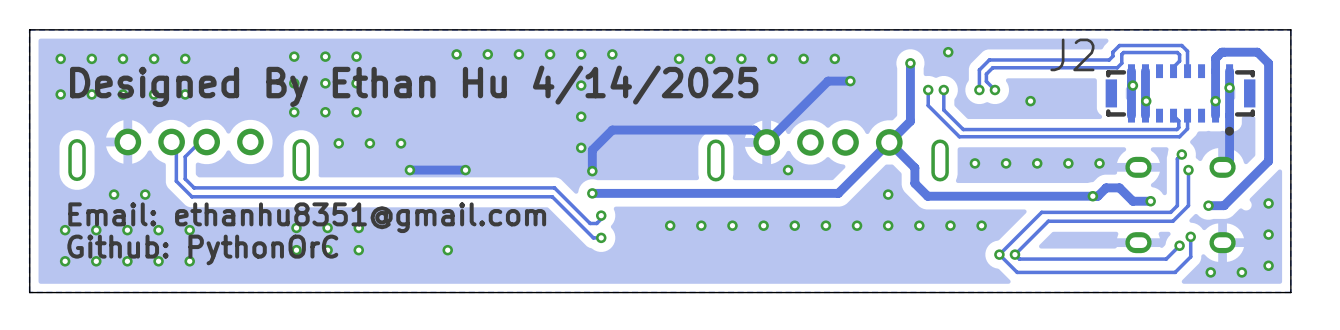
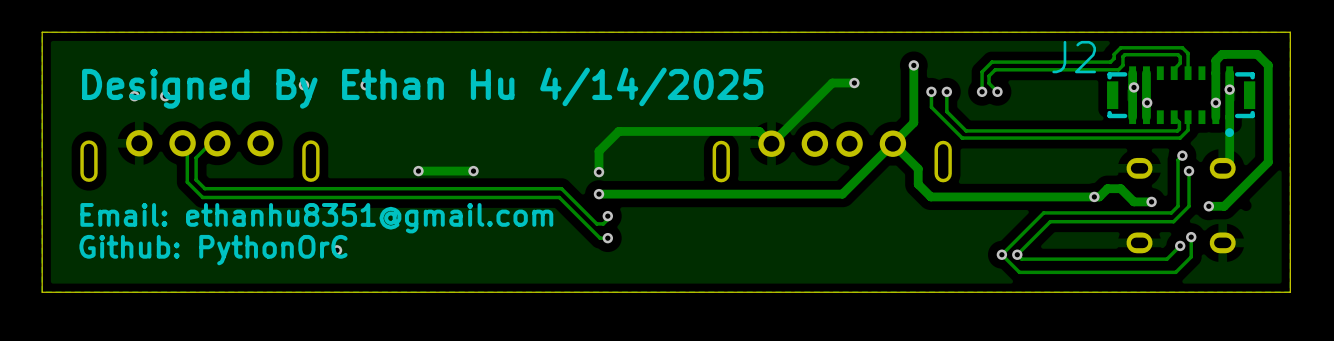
via: (948, 52) -> none
via: (456, 54) -> none
via: (487, 54) -> none
via: (518, 54) -> none
via: (550, 54) -> none
via: (581, 54) -> none
via: (612, 54) -> none
via: (294, 56) -> none
via: (325, 56) -> none
via: (356, 56) -> none
via: (60, 58) -> none
via: (91, 58) -> none
via: (122, 58) -> none
via: (154, 58) -> none
via: (185, 58) -> none
via: (679, 58) -> none
via: (710, 58) -> none
via: (741, 58) -> none
via: (772, 58) -> none
via: (803, 58) -> none
via: (834, 58) -> none
via: (325, 83) -> none
via: (581, 85) -> none
via: (60, 94) -> none
via: (91, 94) -> none
via: (185, 94) -> none
via: (1030, 101) -> none
via: (294, 112) -> none
via: (325, 112) -> none
via: (356, 112) -> none
via: (581, 116) -> none
via: (338, 143) -> none
via: (369, 143) -> none
via: (401, 143) -> none
via: (581, 147) -> none
via: (974, 163) -> none
via: (1006, 163) -> none
via: (1037, 163) -> none
via: (1068, 163) -> none
via: (1099, 163) -> none
via: (788, 170) -> none
via: (114, 194) -> none
via: (145, 194) -> none
via: (888, 194) -> none
via: (1268, 203) -> none
via: (670, 225) -> none
via: (701, 225) -> none
via: (732, 225) -> none
via: (763, 225) -> none
via: (794, 225) -> none
via: (825, 225) -> none
via: (857, 225) -> none
via: (888, 225) -> none
via: (919, 225) -> none
via: (950, 225) -> none
via: (981, 225) -> none
via: (296, 227) -> none
via: (327, 227) -> none
via: (358, 227) -> none
via: (65, 230) -> none
via: (96, 230) -> none
via: (127, 230) -> none
via: (158, 230) -> none
via: (189, 230) -> none
via: (1268, 234) -> none
via: (296, 250) -> none
via: (358, 250) -> none
via: (447, 250) -> none
via: (65, 261) -> none
via: (96, 261) -> none
via: (127, 261) -> none
via: (158, 261) -> none
via: (189, 261) -> none
via: (1268, 265) -> none
via: (1210, 272) -> none
via: (1241, 272) -> none

